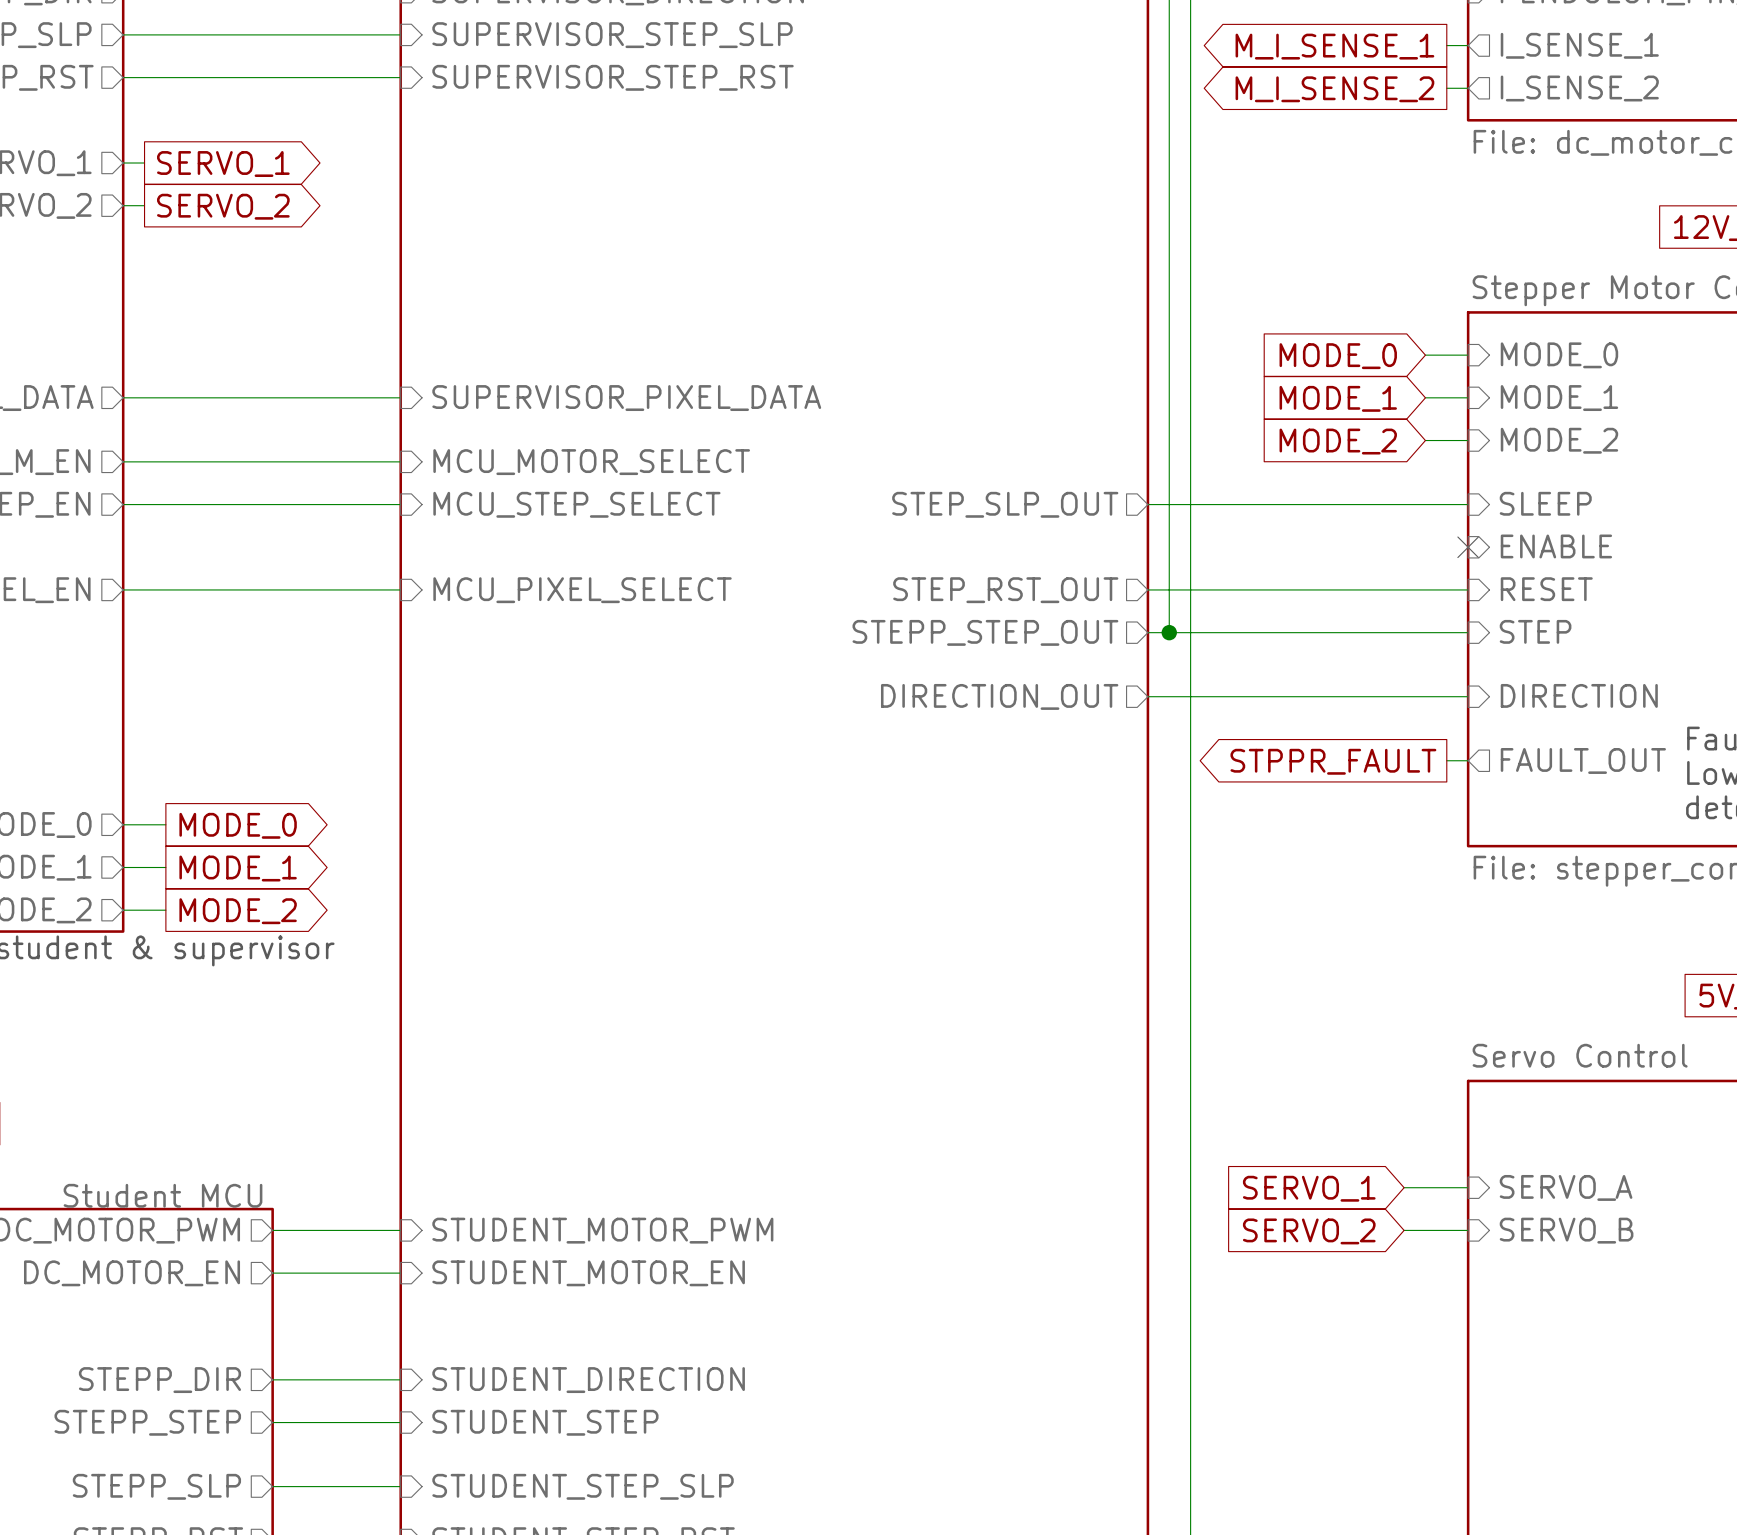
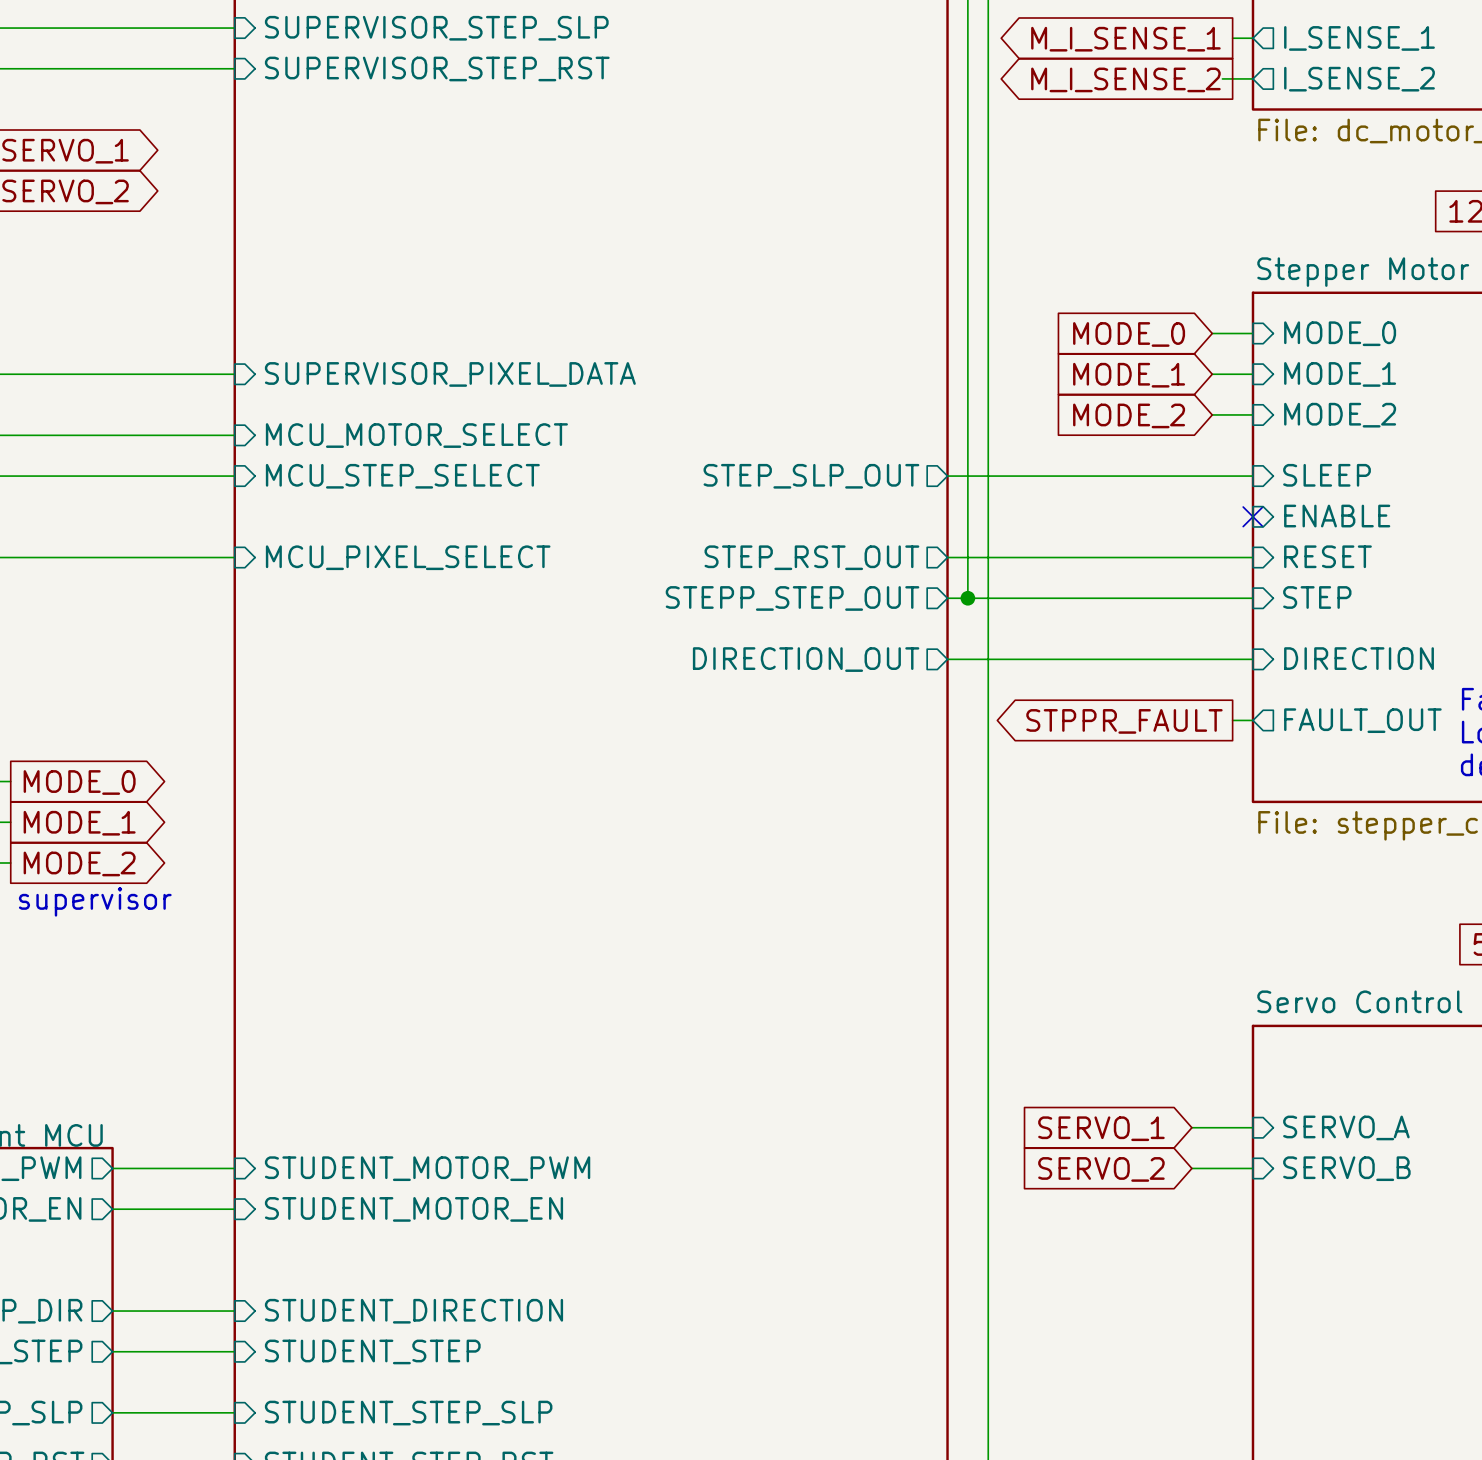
wire: none -> (1222, 78) (1232, 78)

